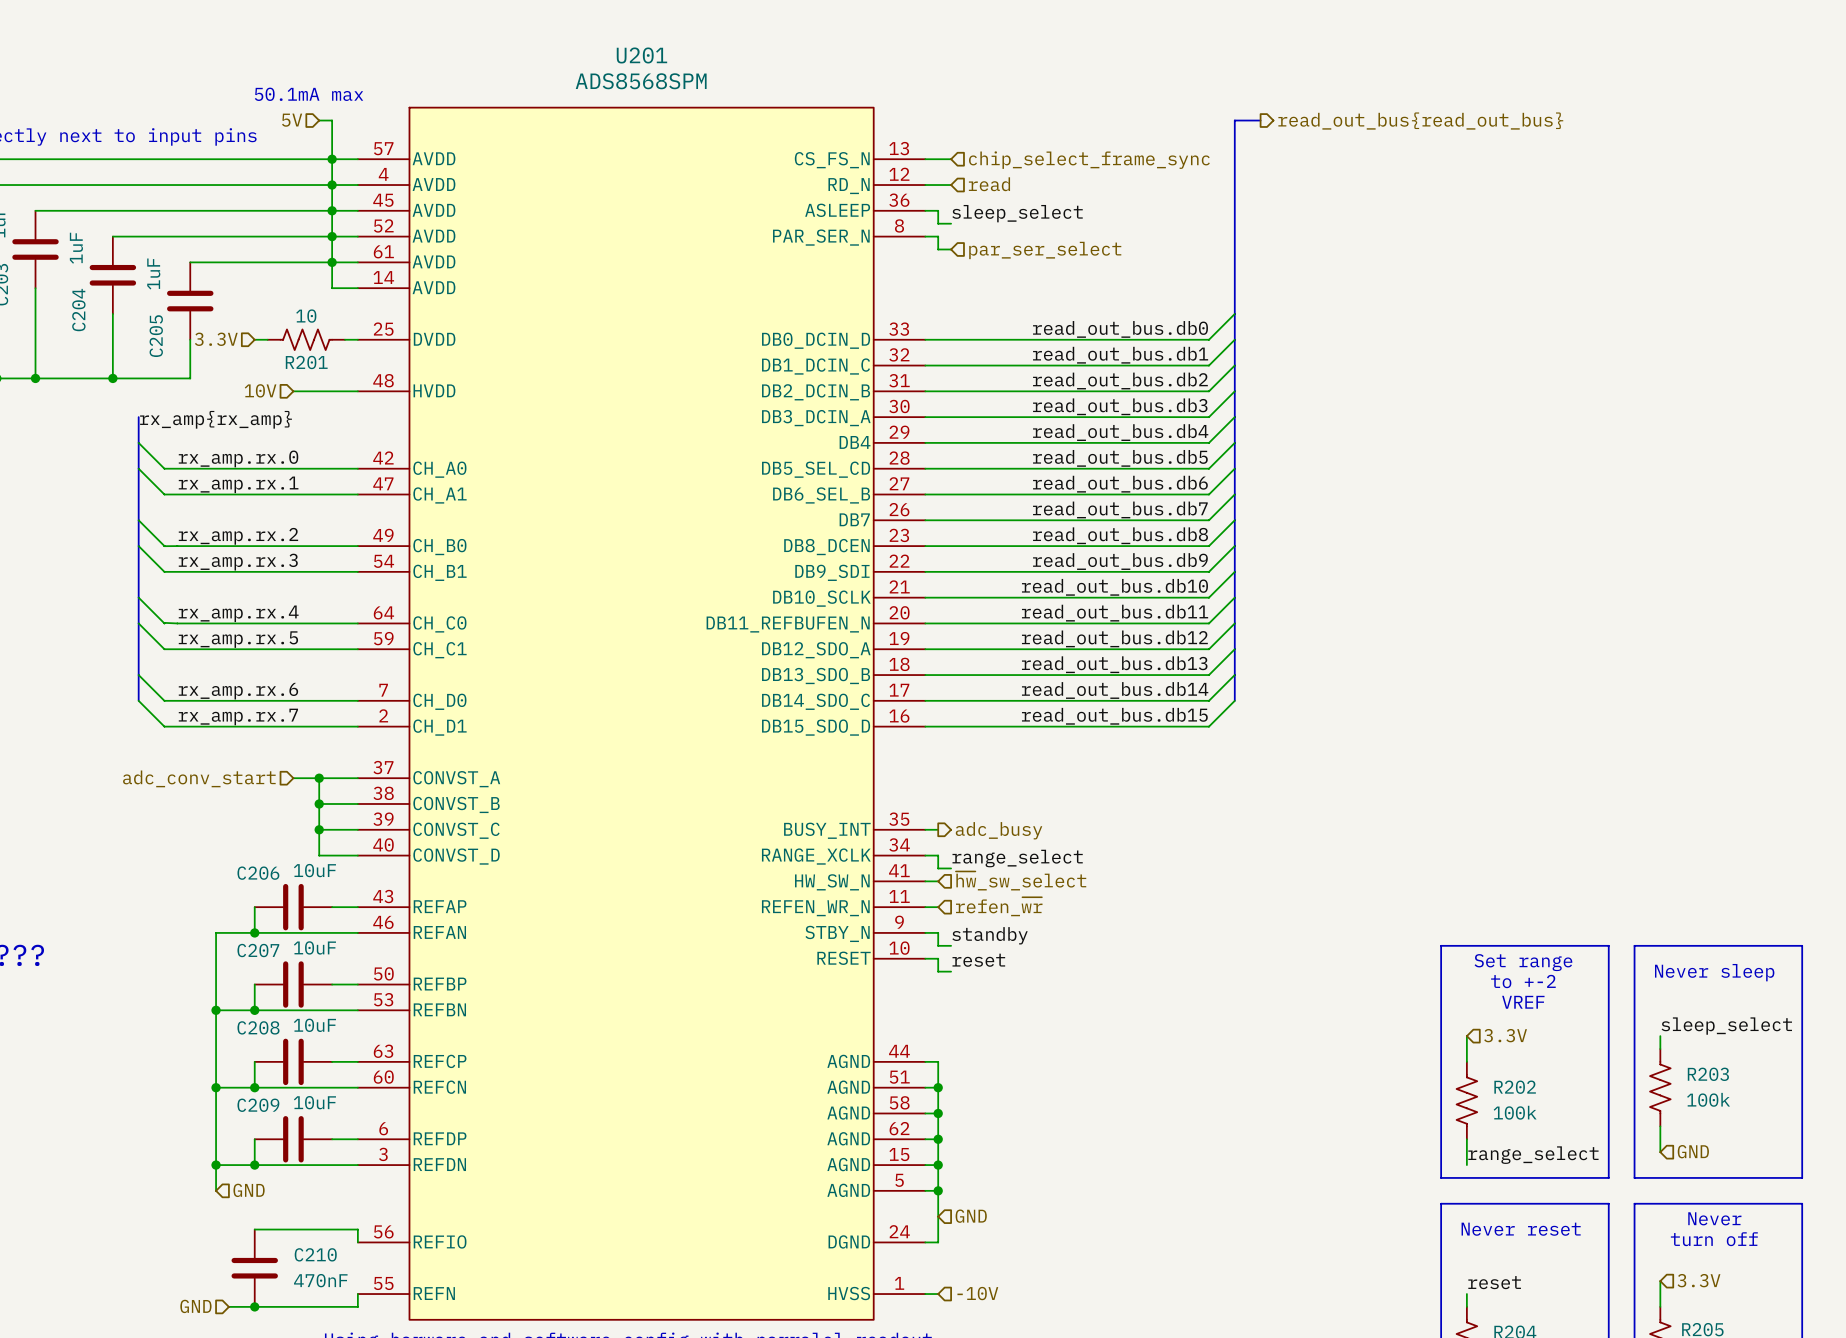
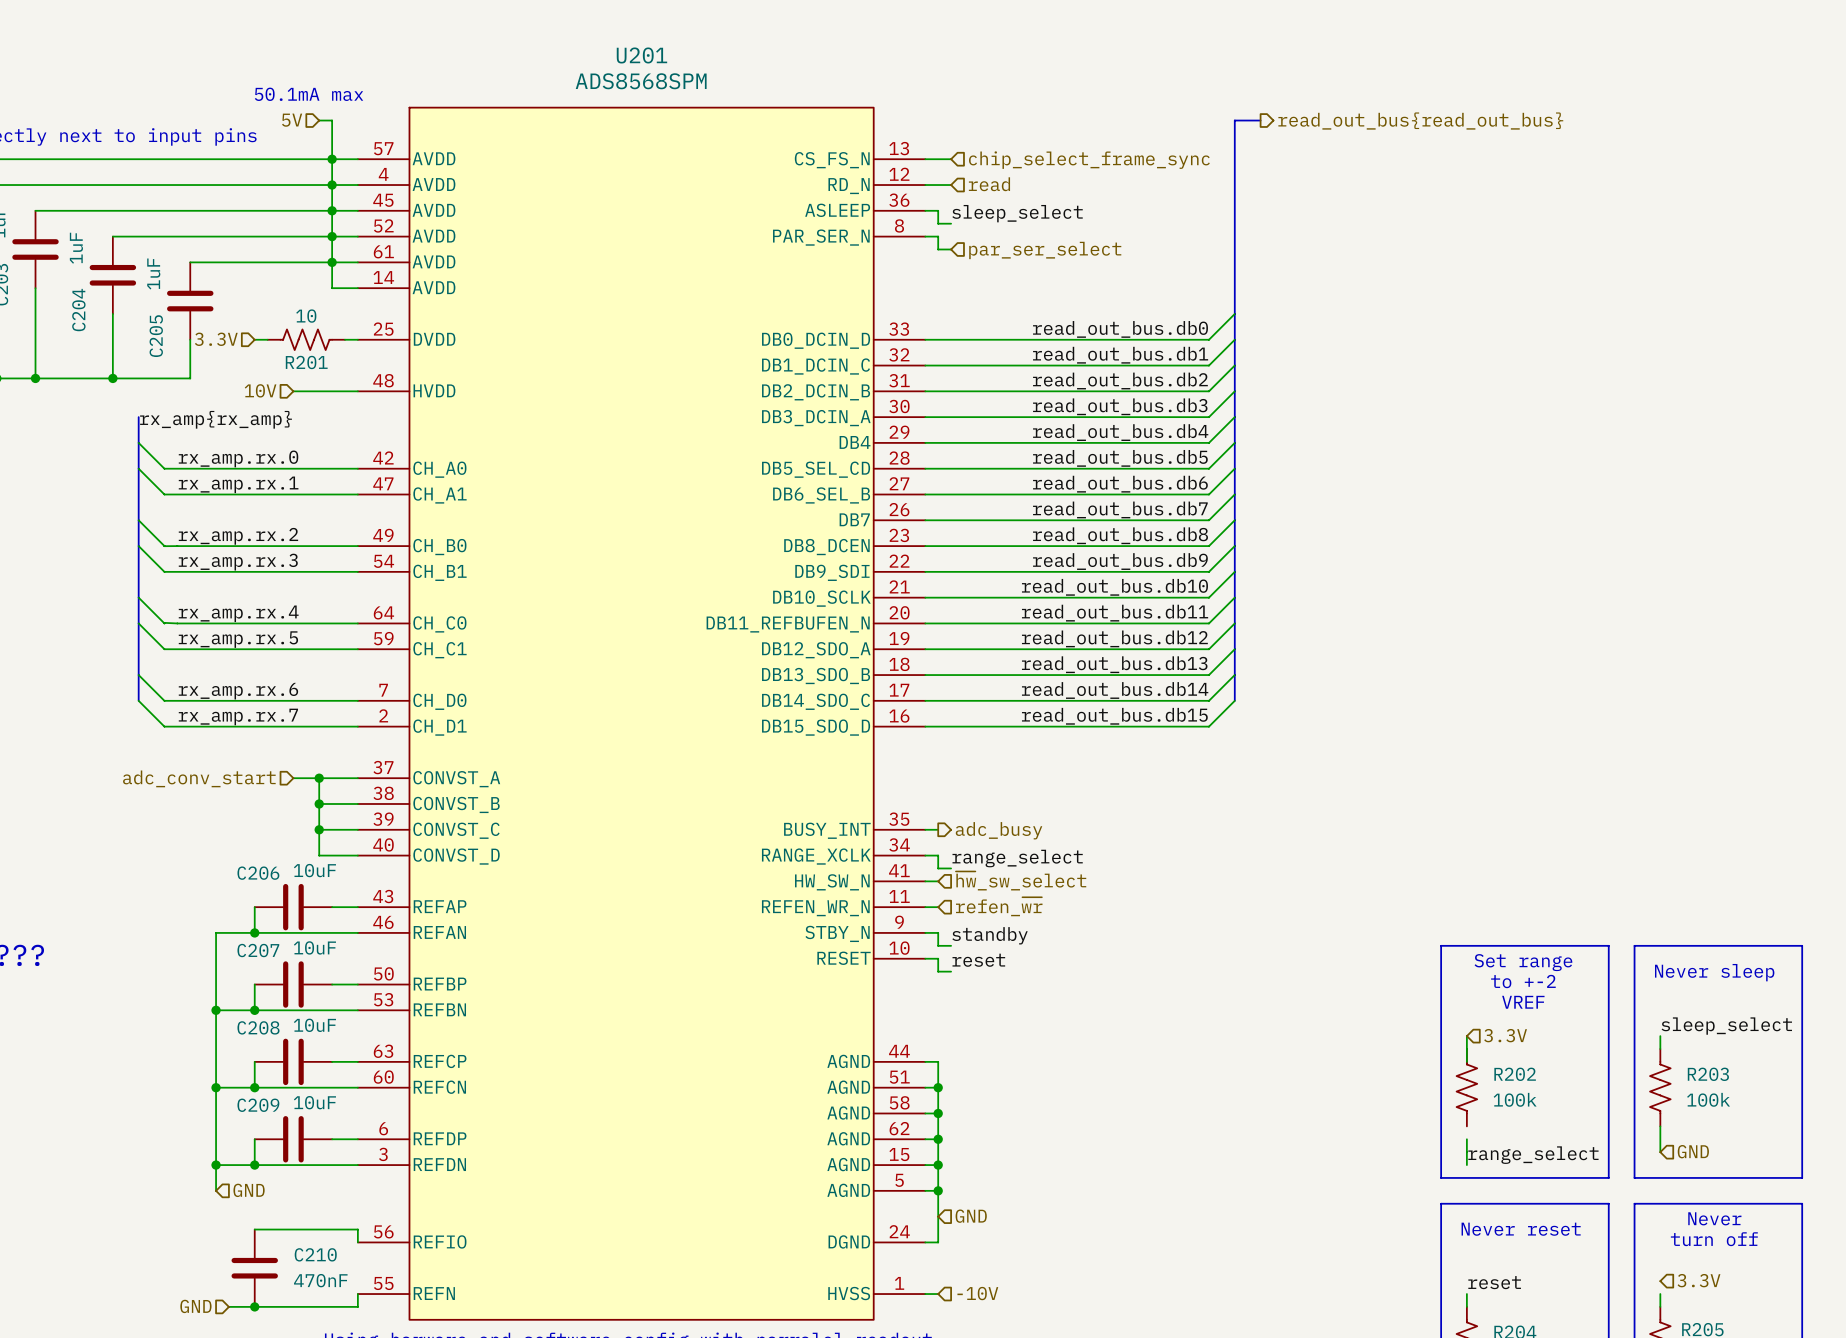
R202 position: (1466, 1100) -> (1466, 1087)
wire: (1660, 1281) (1660, 1294) -> none

